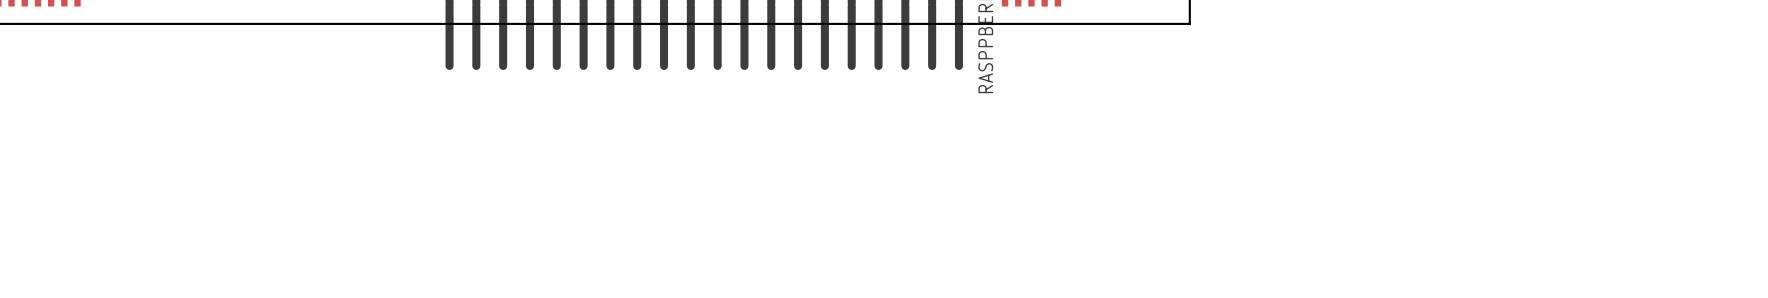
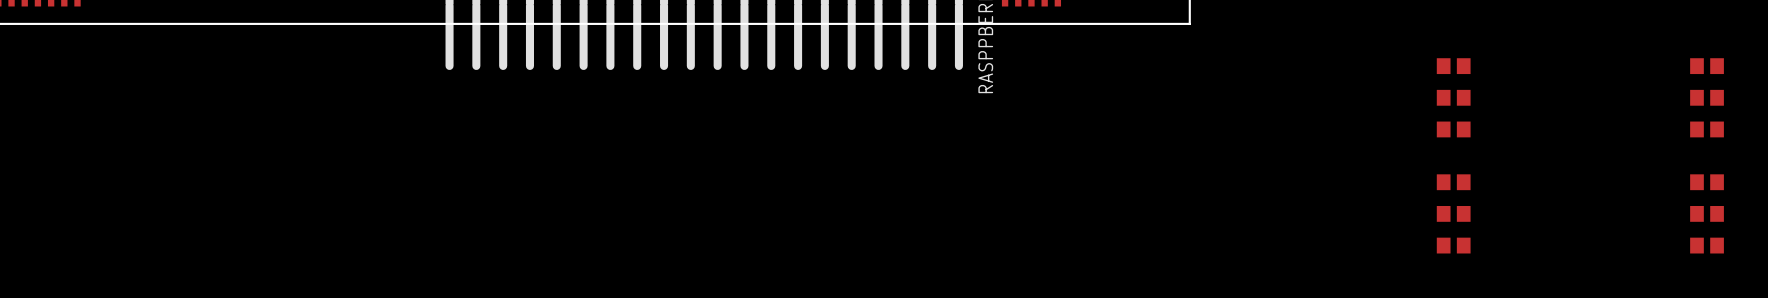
part: none -> (1453, 66)
part: none -> (1707, 66)
part: none -> (1453, 97)
part: none -> (1707, 97)
part: none -> (1453, 129)
part: none -> (1707, 129)
part: none -> (1453, 182)
part: none -> (1707, 182)
part: none -> (1453, 213)
part: none -> (1707, 213)
part: none -> (1453, 245)
part: none -> (1707, 245)

